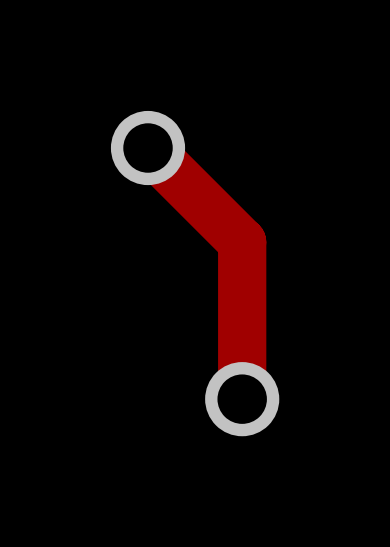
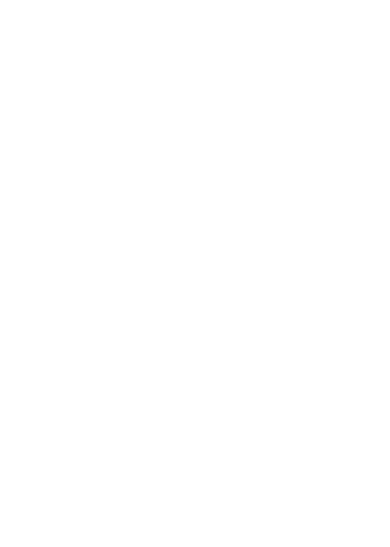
track: (148, 148) (242, 242) (242, 399) -> none
via: (148, 148) -> none
via: (242, 399) -> none

